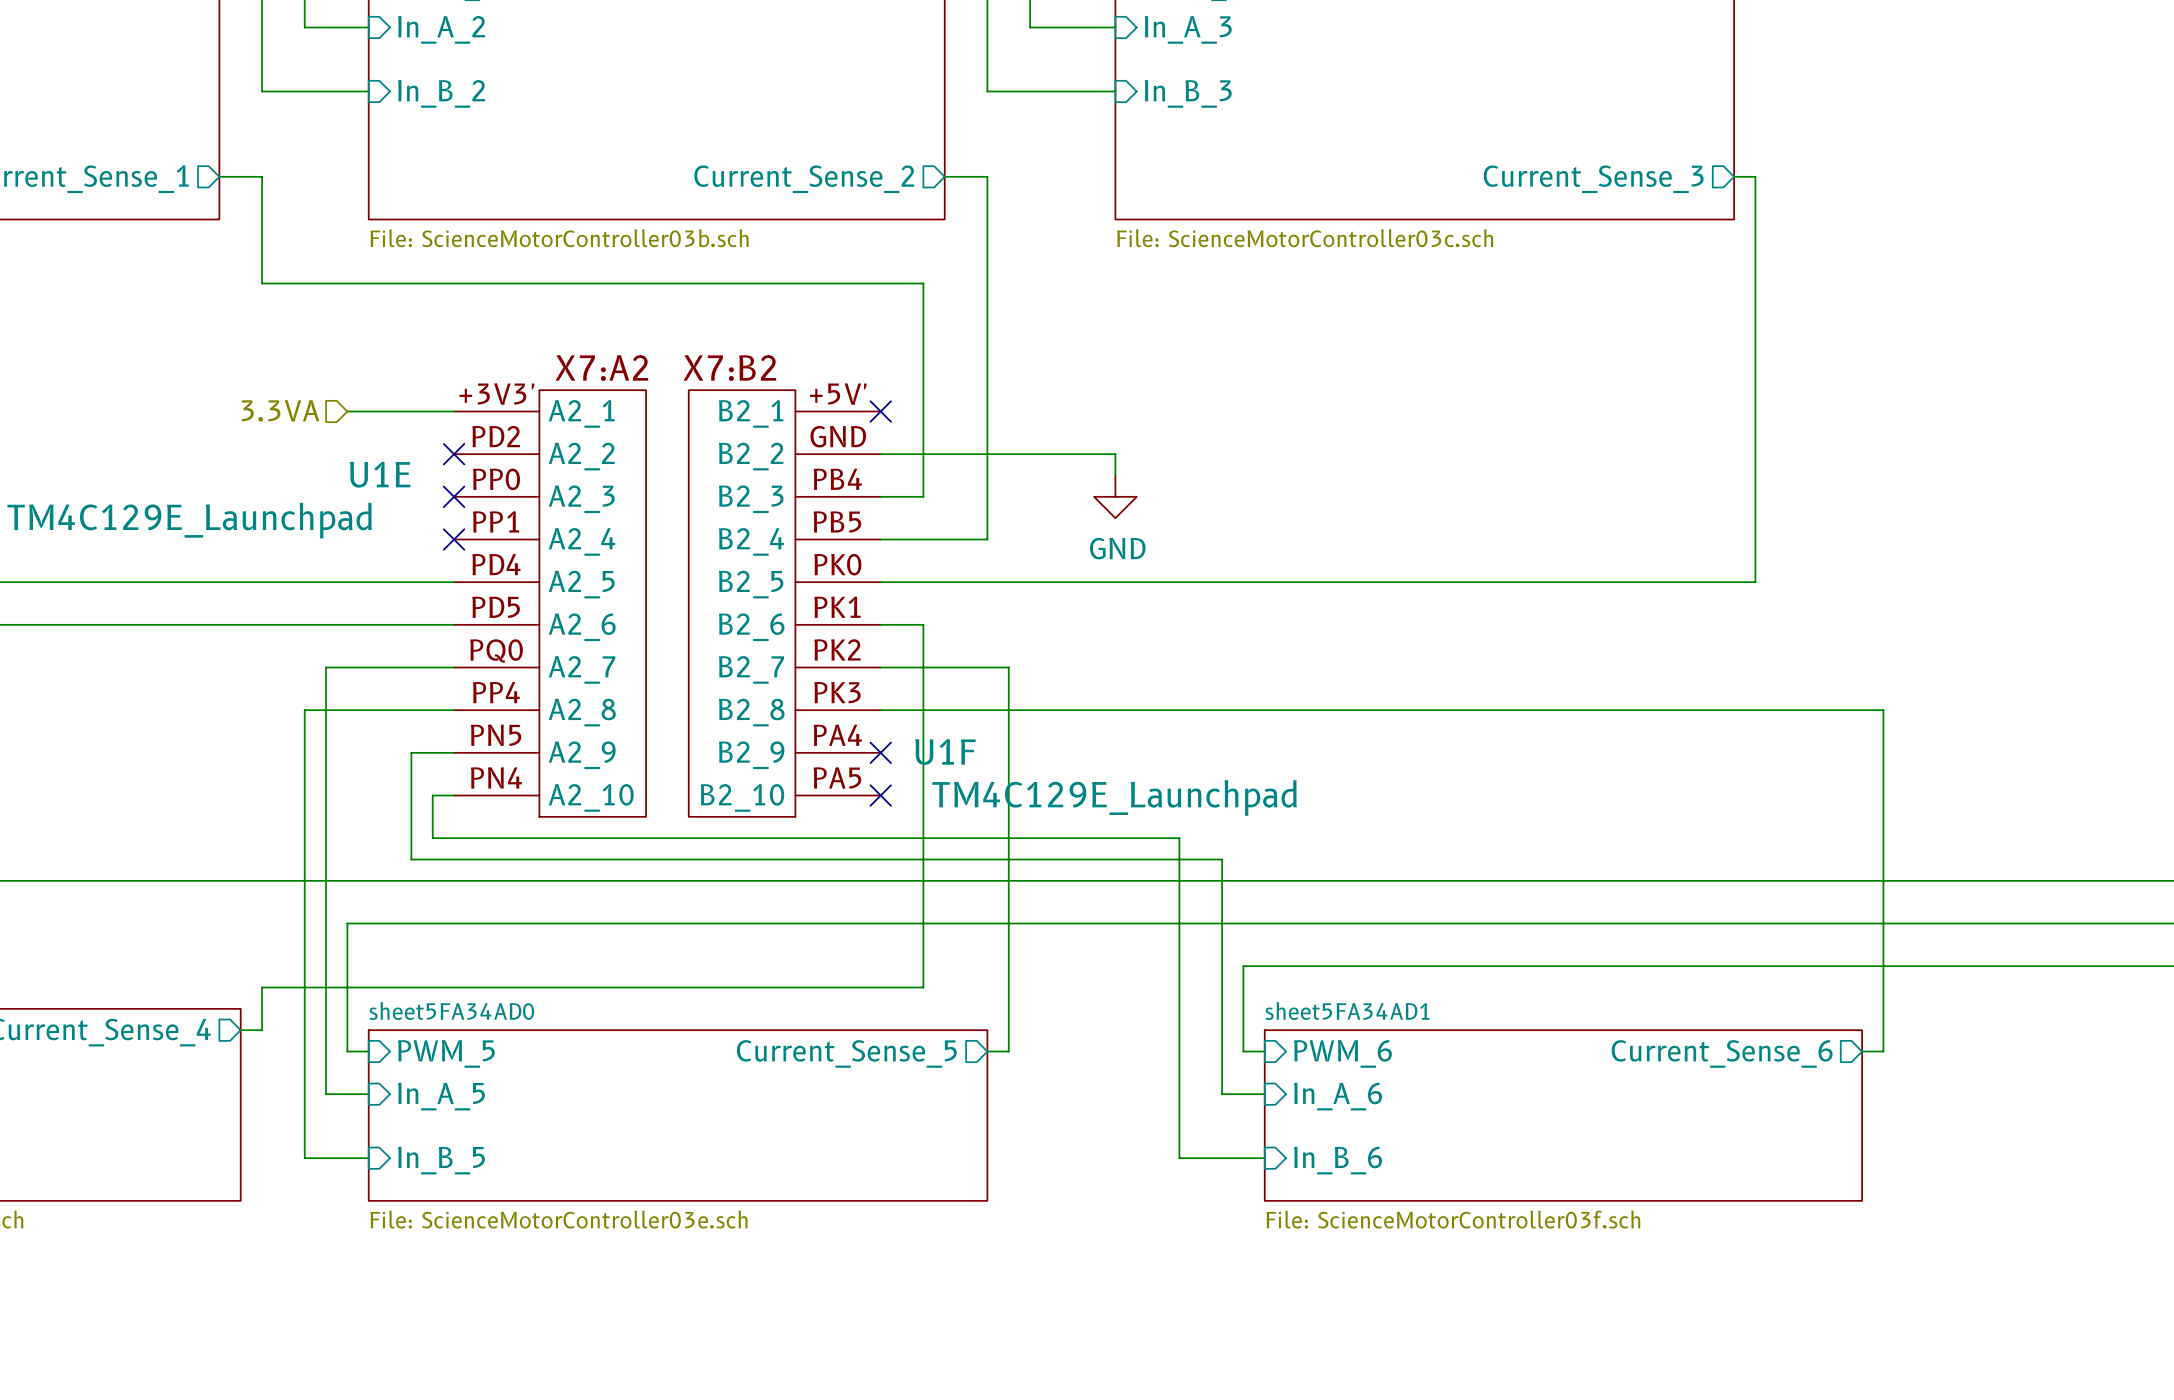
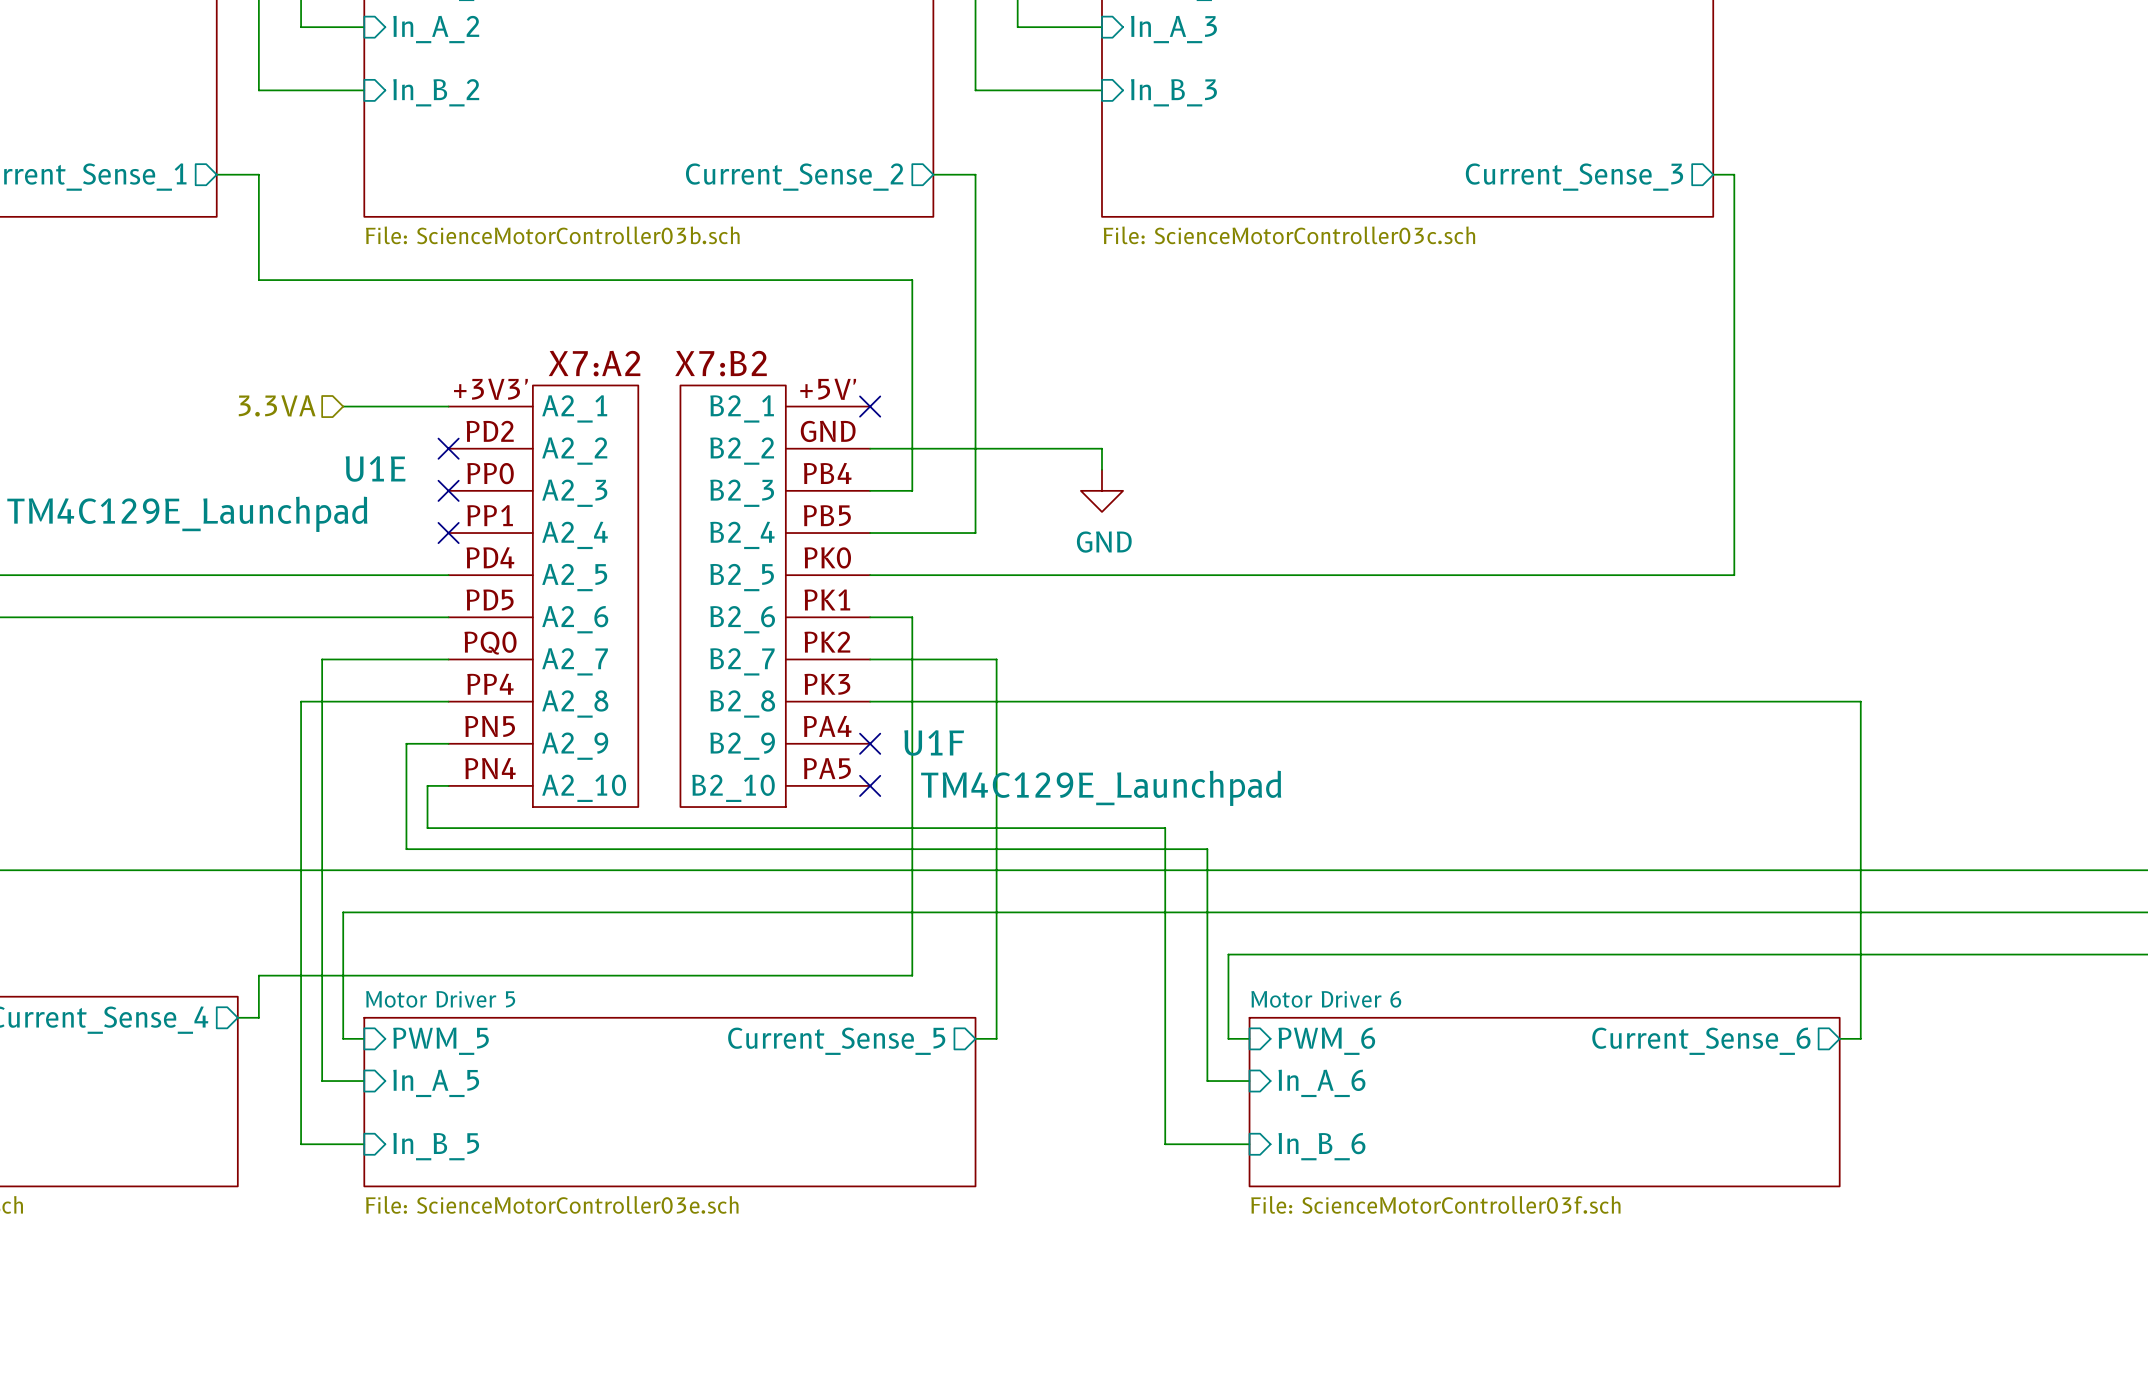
sheet sheet5FA34AD0 name: sheet5FA34AD0 (451, 1010) -> Motor Driver 5 (440, 999)
sheet sheet5FA34AD1 name: sheet5FA34AD1 (1347, 1010) -> Motor Driver 6 (1326, 999)

